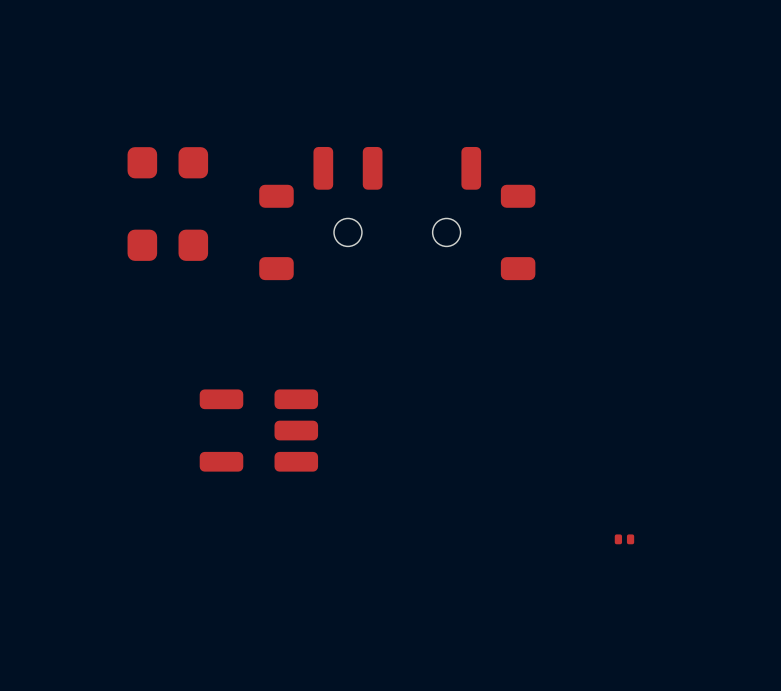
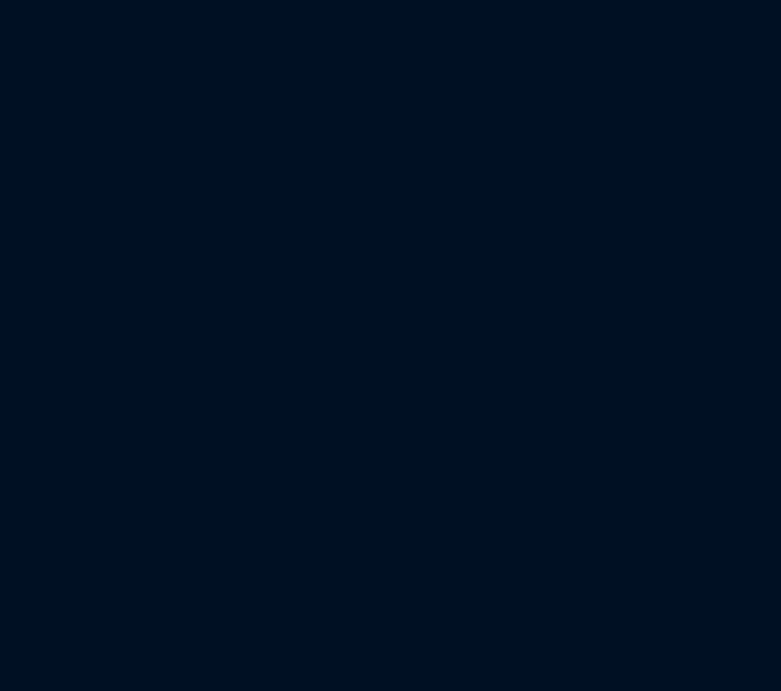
part: (167, 162) -> none
part: (397, 213) -> none
part: (167, 245) -> none
part: (258, 430) -> none
part: (624, 539) -> none

